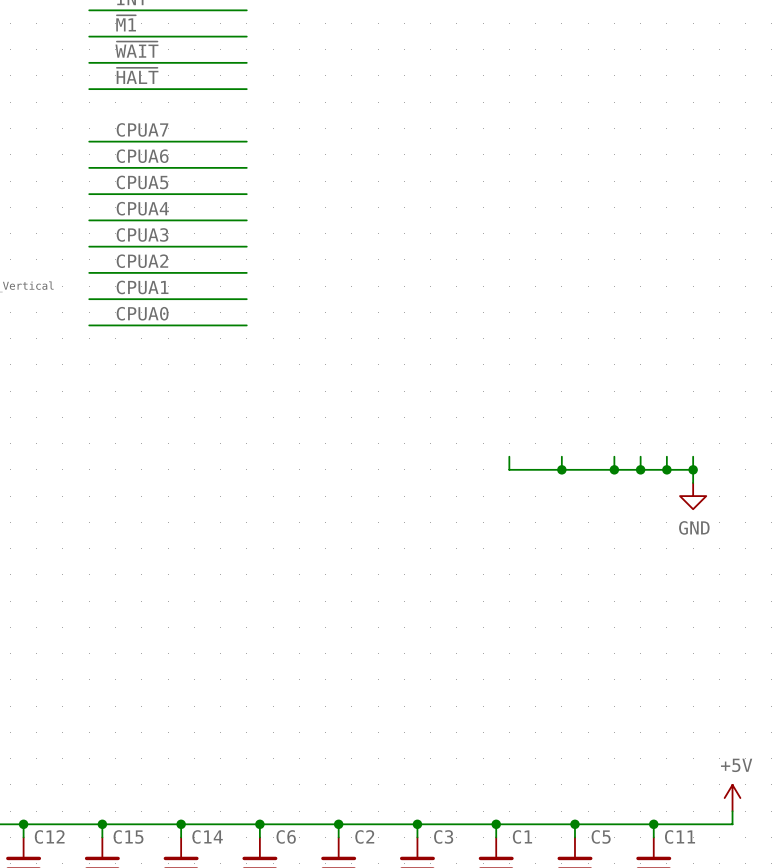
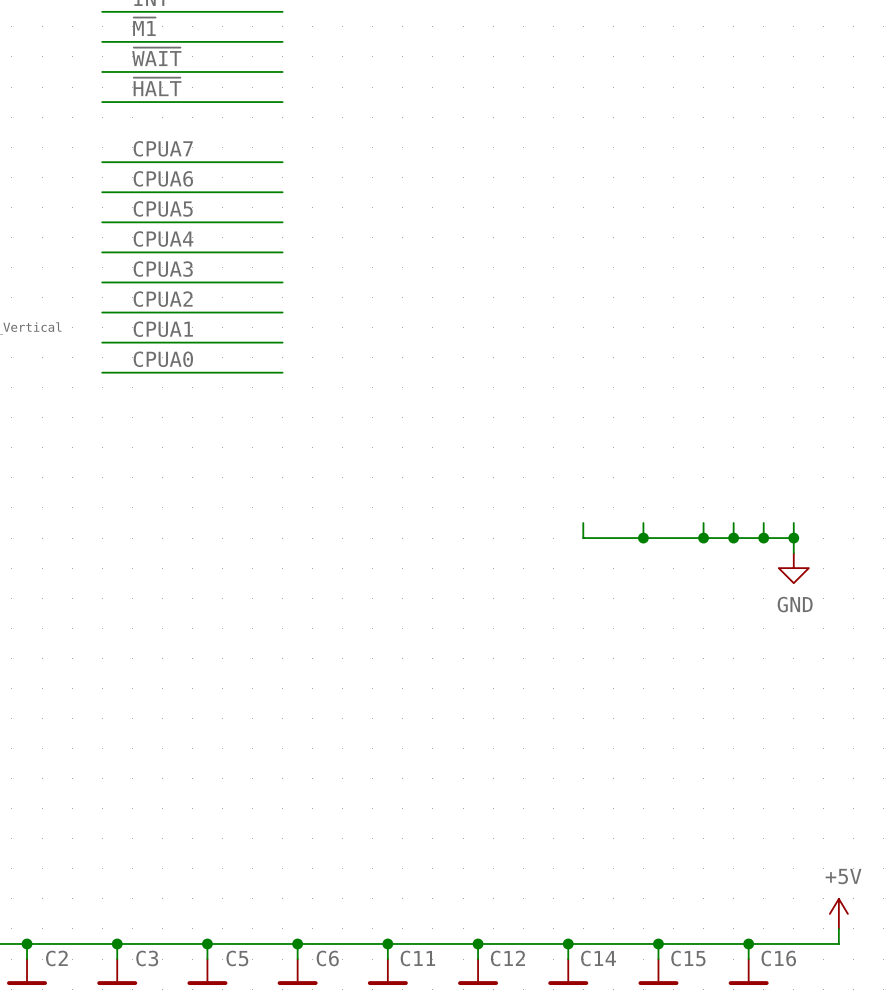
C12 name: C12 (49, 836) -> C2 (56, 958)
C15 name: C15 (128, 836) -> C3 (147, 958)
C14 name: C14 (207, 836) -> C5 (237, 958)
C2 name: C2 (364, 836) -> C11 (417, 958)
C3 name: C3 (443, 836) -> C12 (507, 958)
C1 name: C1 (522, 836) -> C14 (598, 958)
C5 name: C5 (601, 836) -> C15 (688, 958)
C11 name: C11 (680, 836) -> C16 (778, 958)

